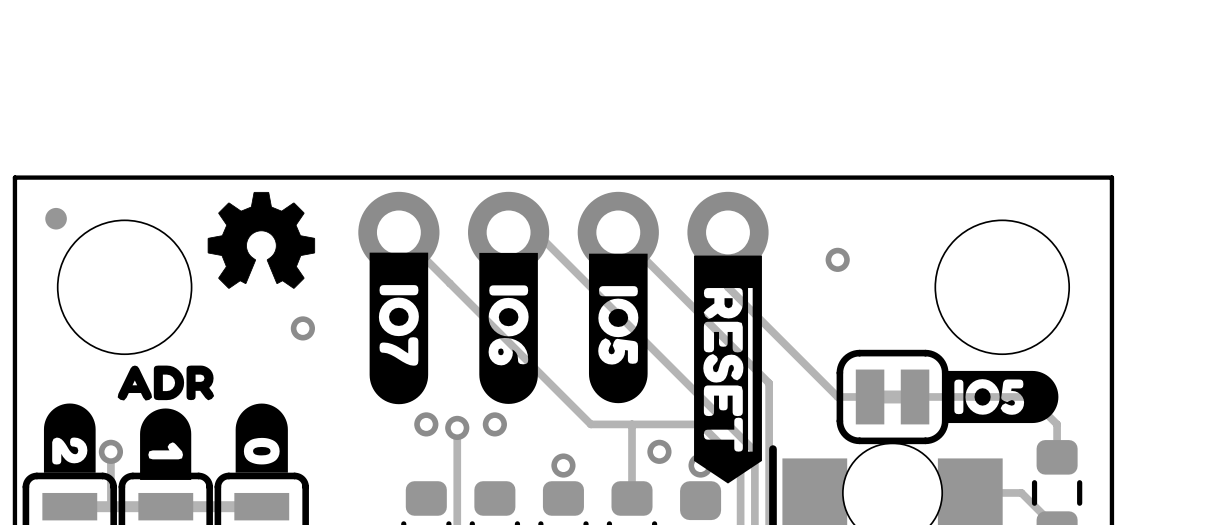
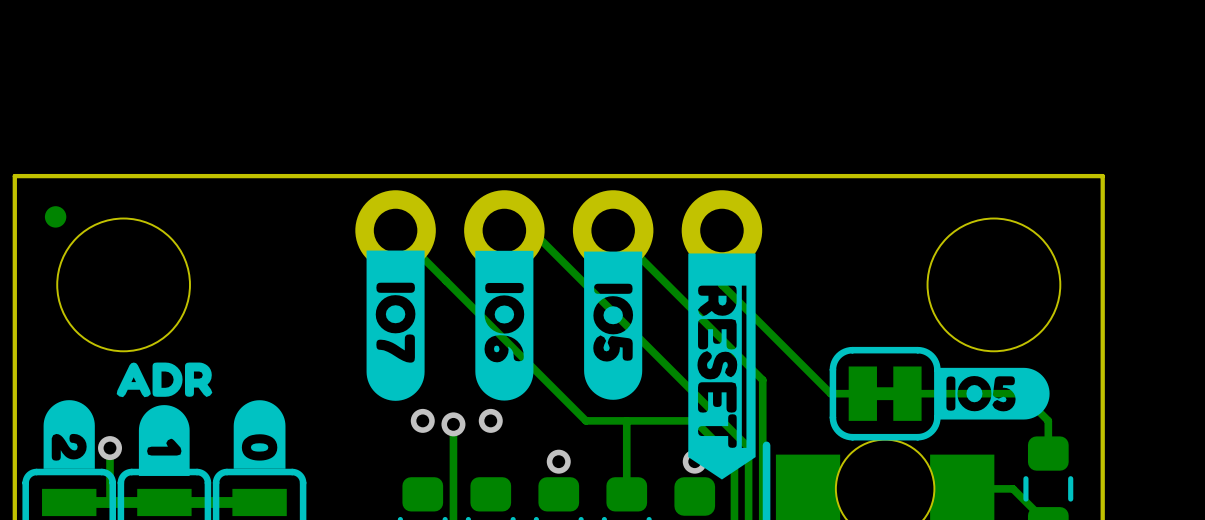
drawing: [207, 191, 316, 289] -> none
via: (837, 259) -> none
via: (302, 328) -> none
via: (659, 451) -> none

